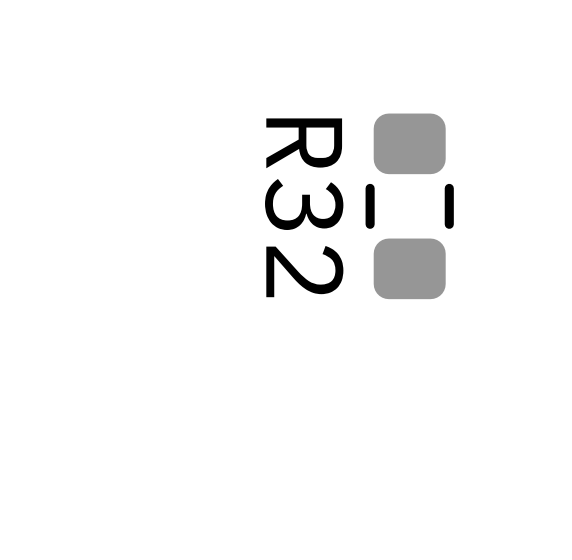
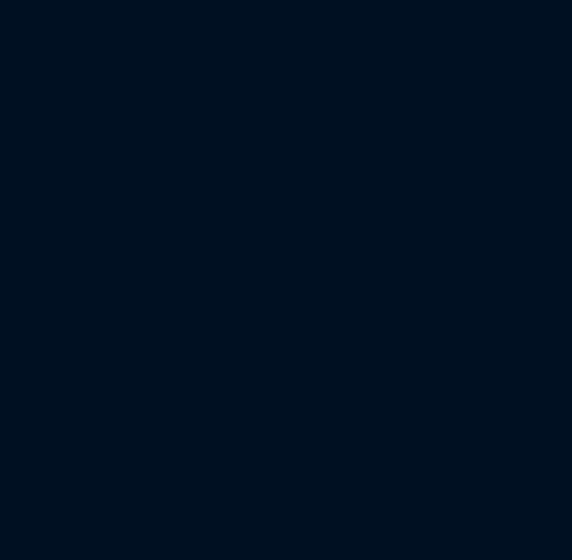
R32: (409, 206) -> none

